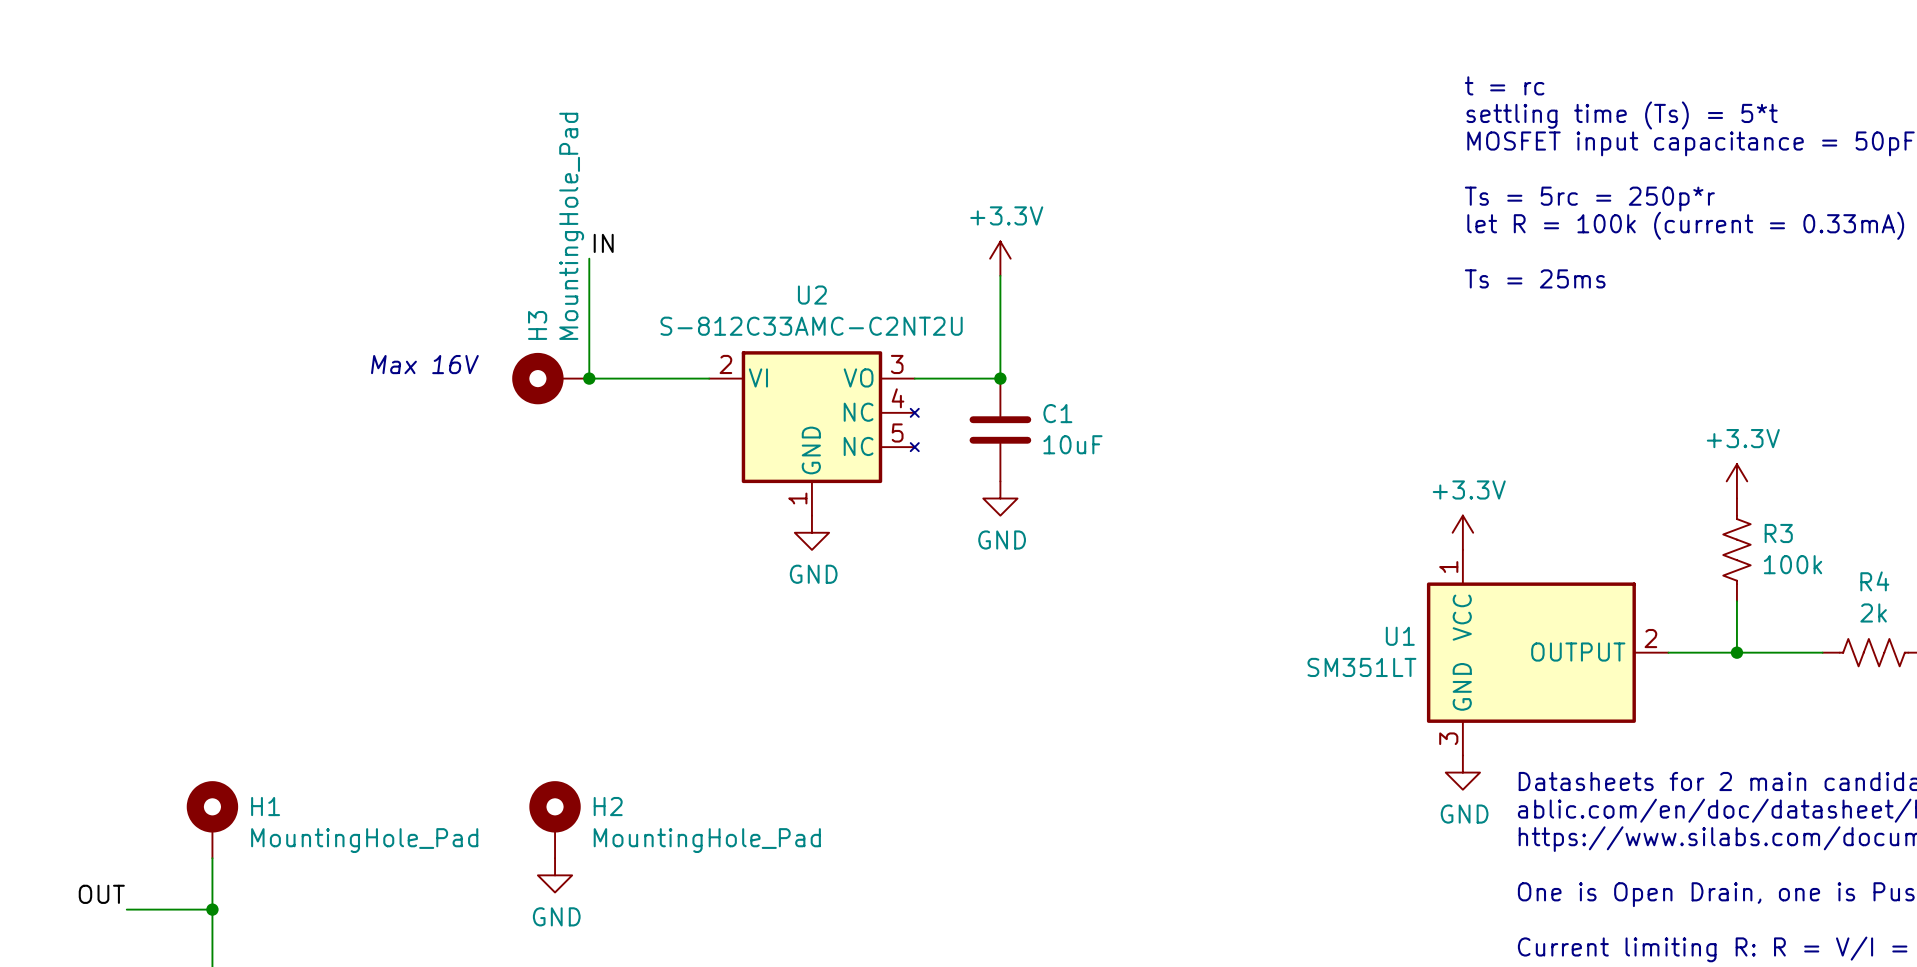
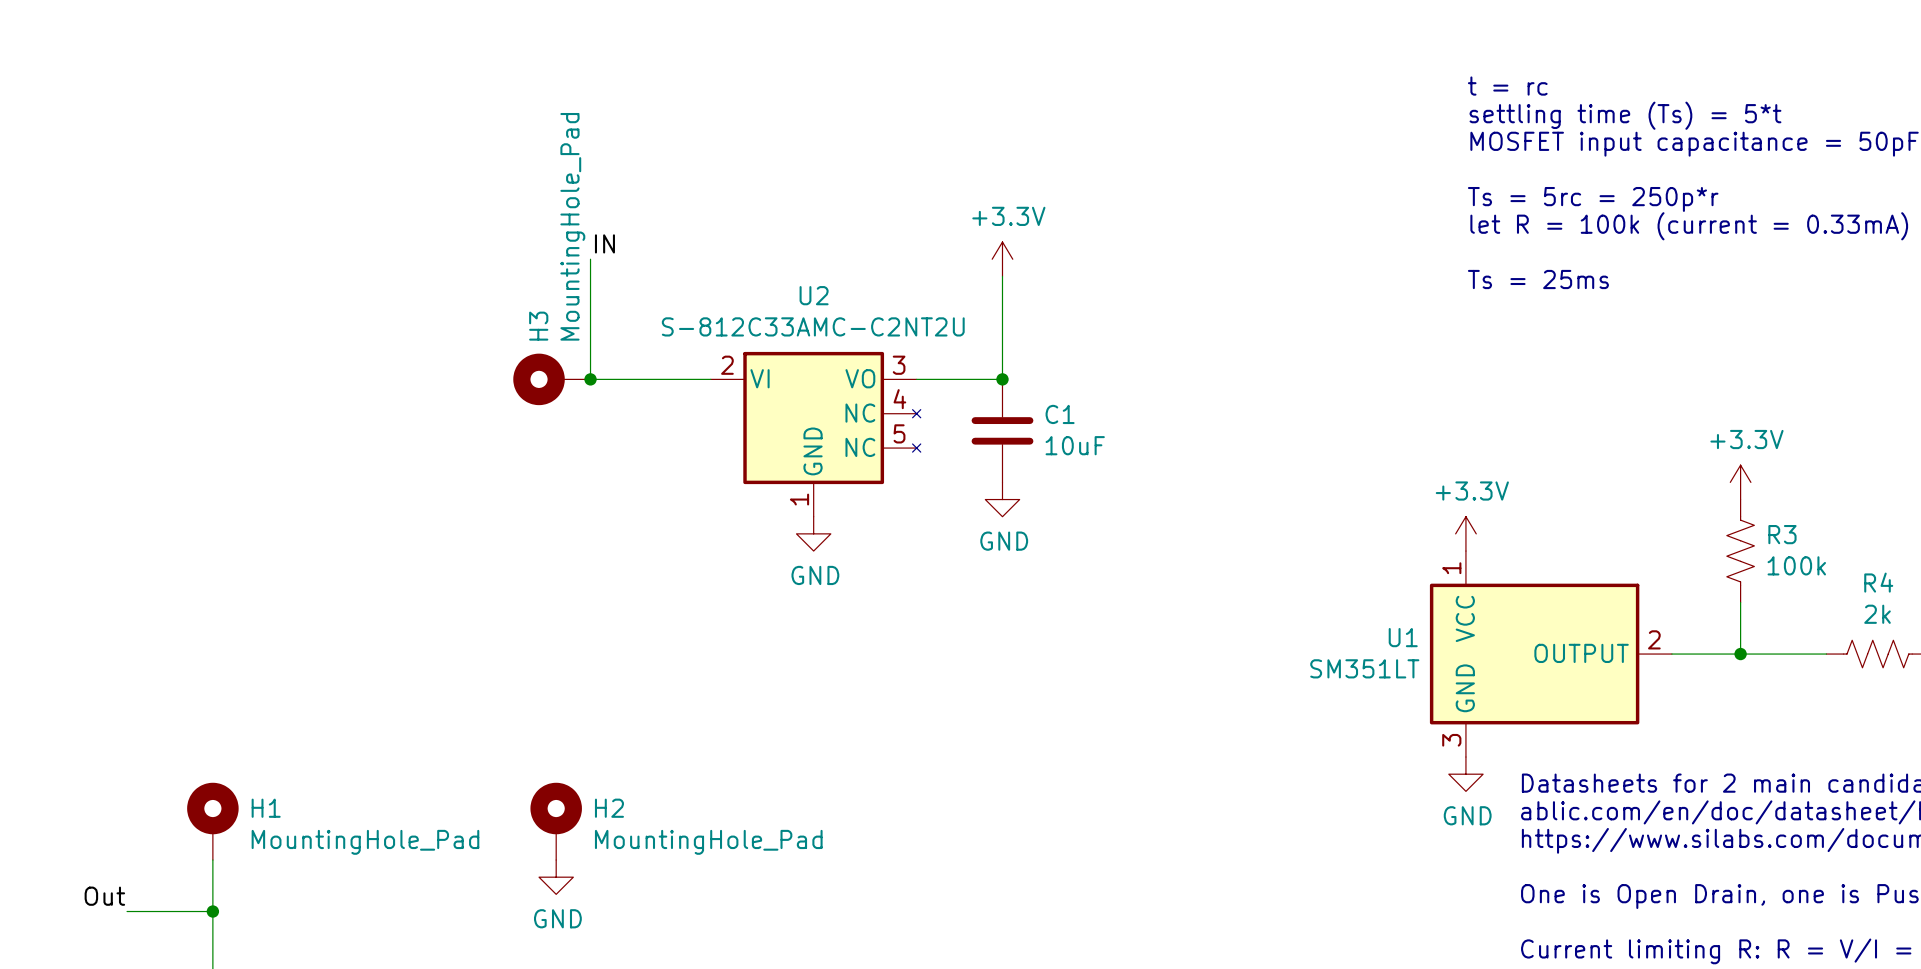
text: Max 16V (424, 364) -> none
label: OUT (101, 894) -> Out (104, 896)

